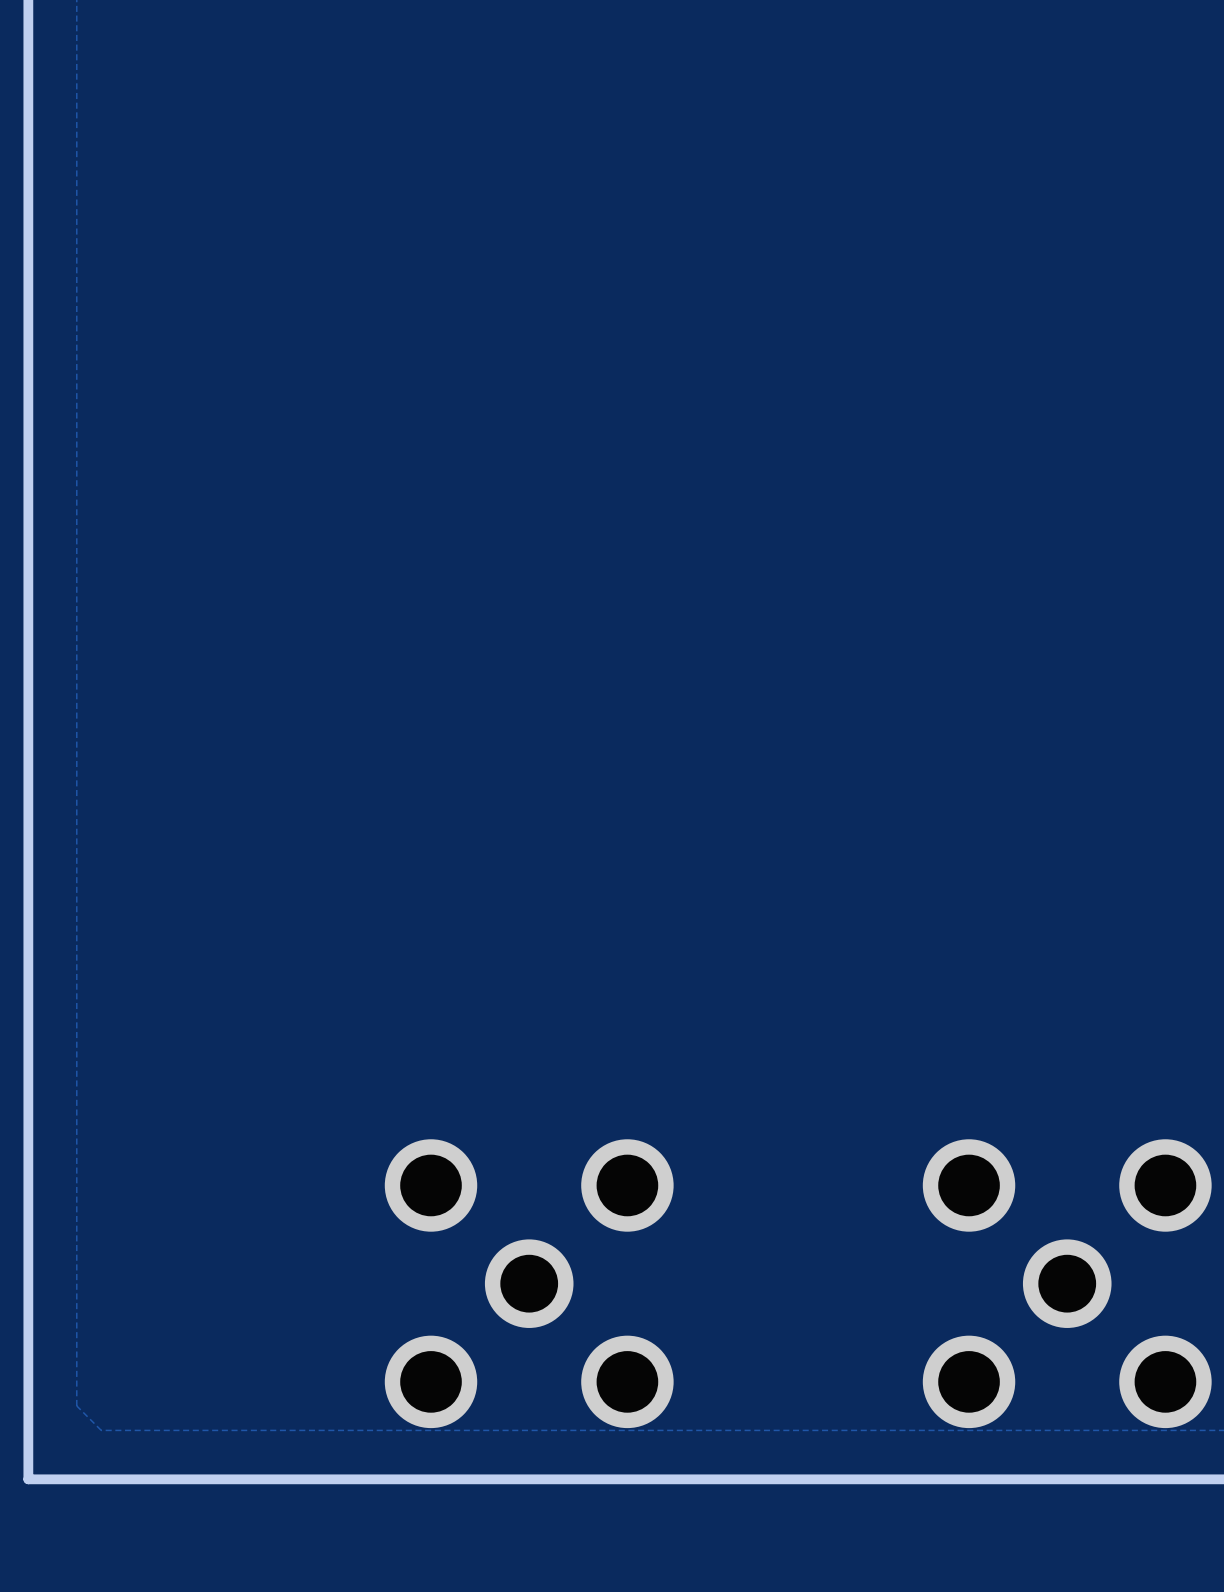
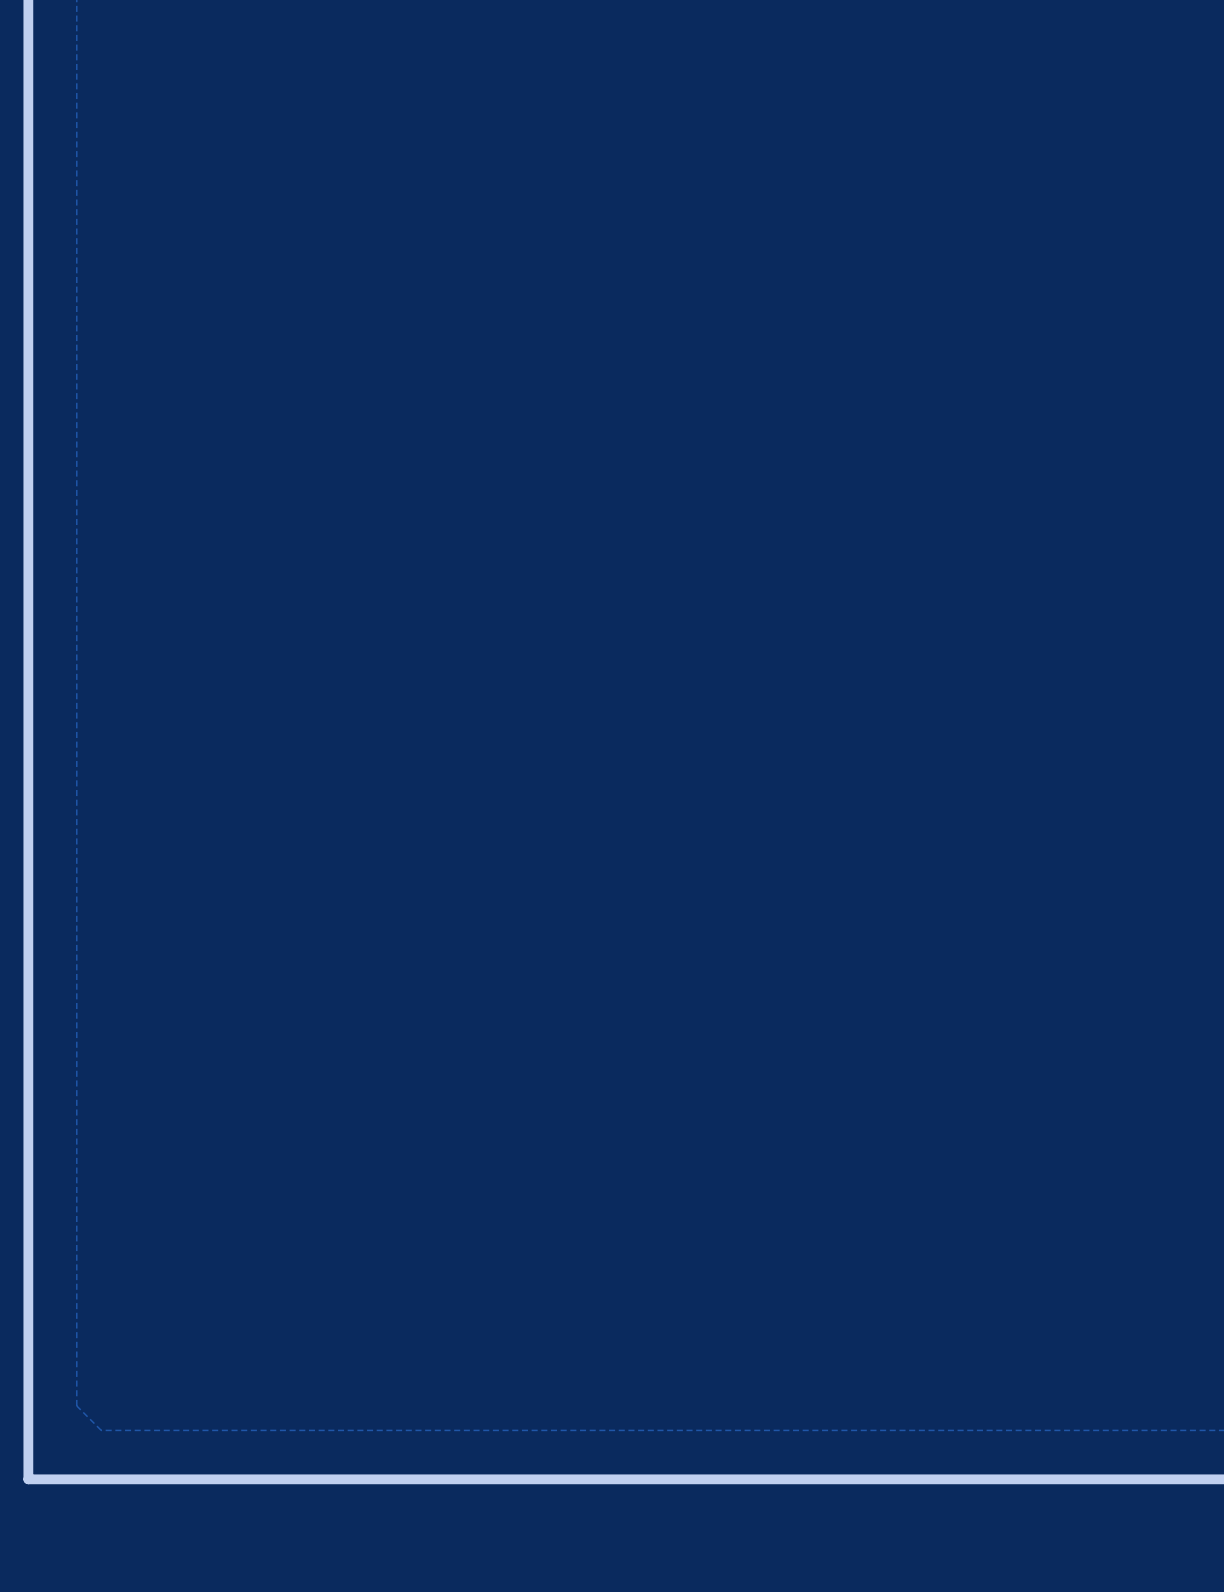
part: (529, 1283) -> none
part: (1067, 1283) -> none

